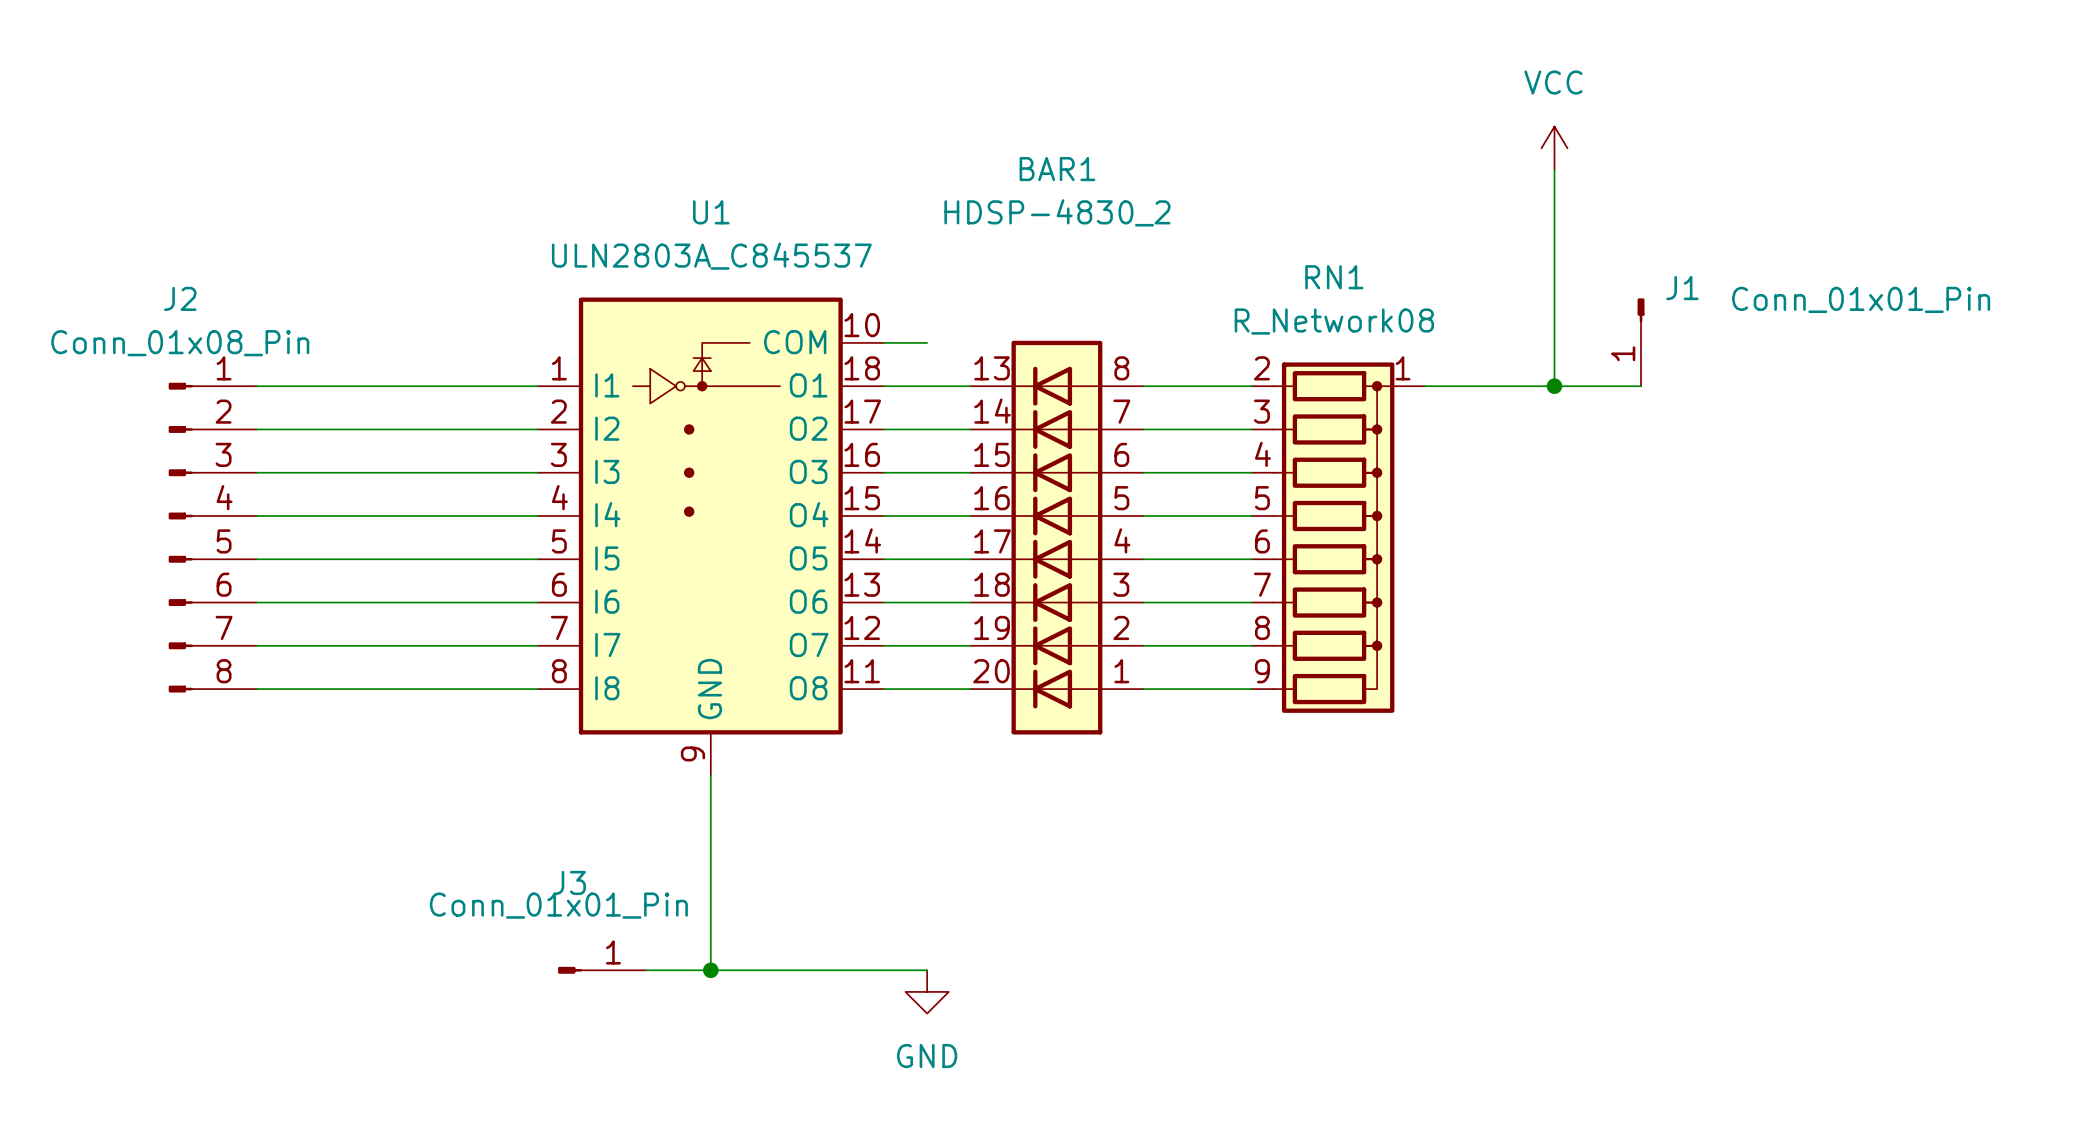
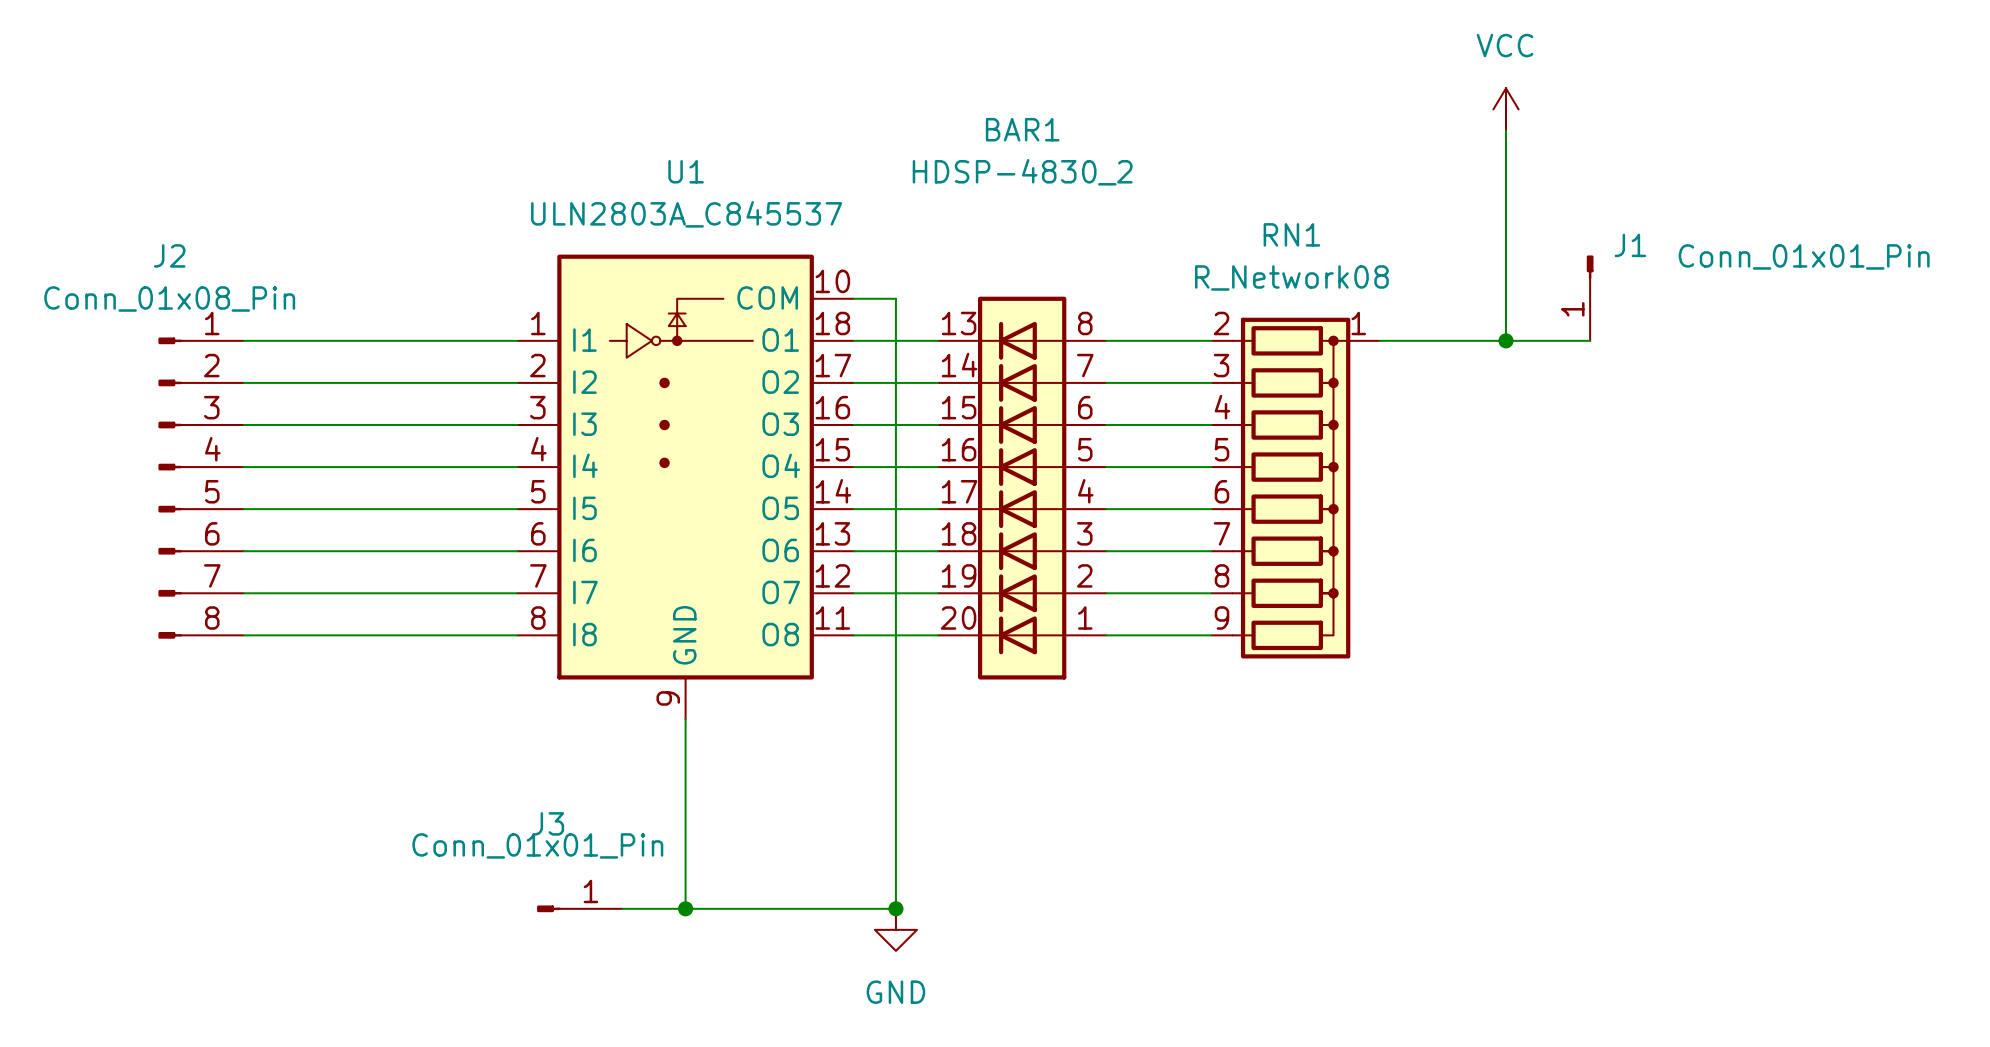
wire: none -> (895, 298) (895, 908)
junction: none -> (895, 908)

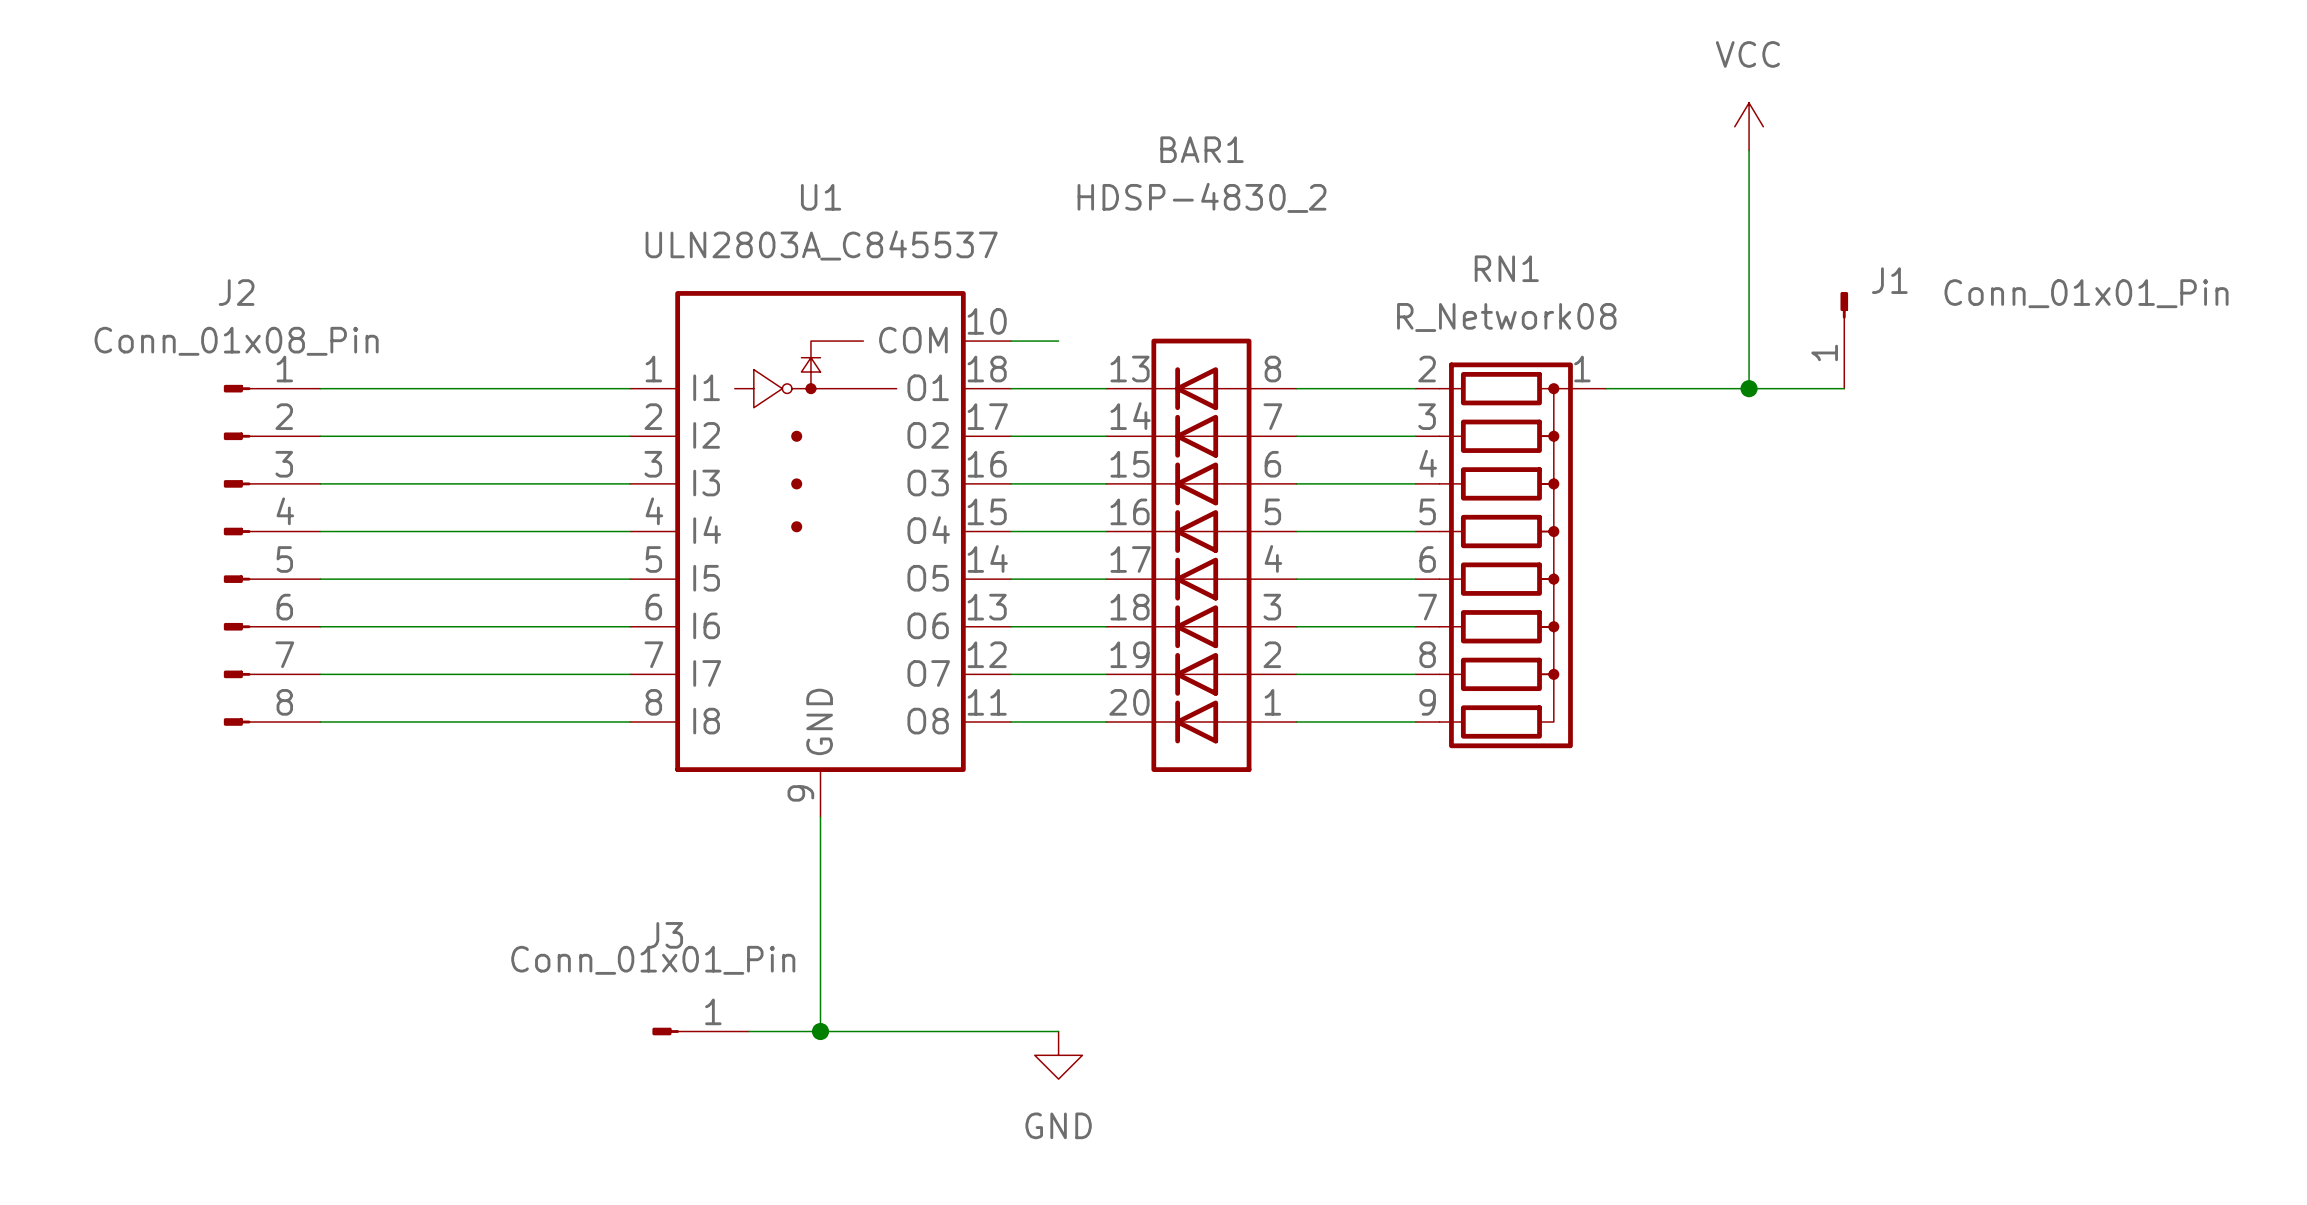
wire: (895, 298) (895, 908) -> none
junction: (895, 908) -> none

